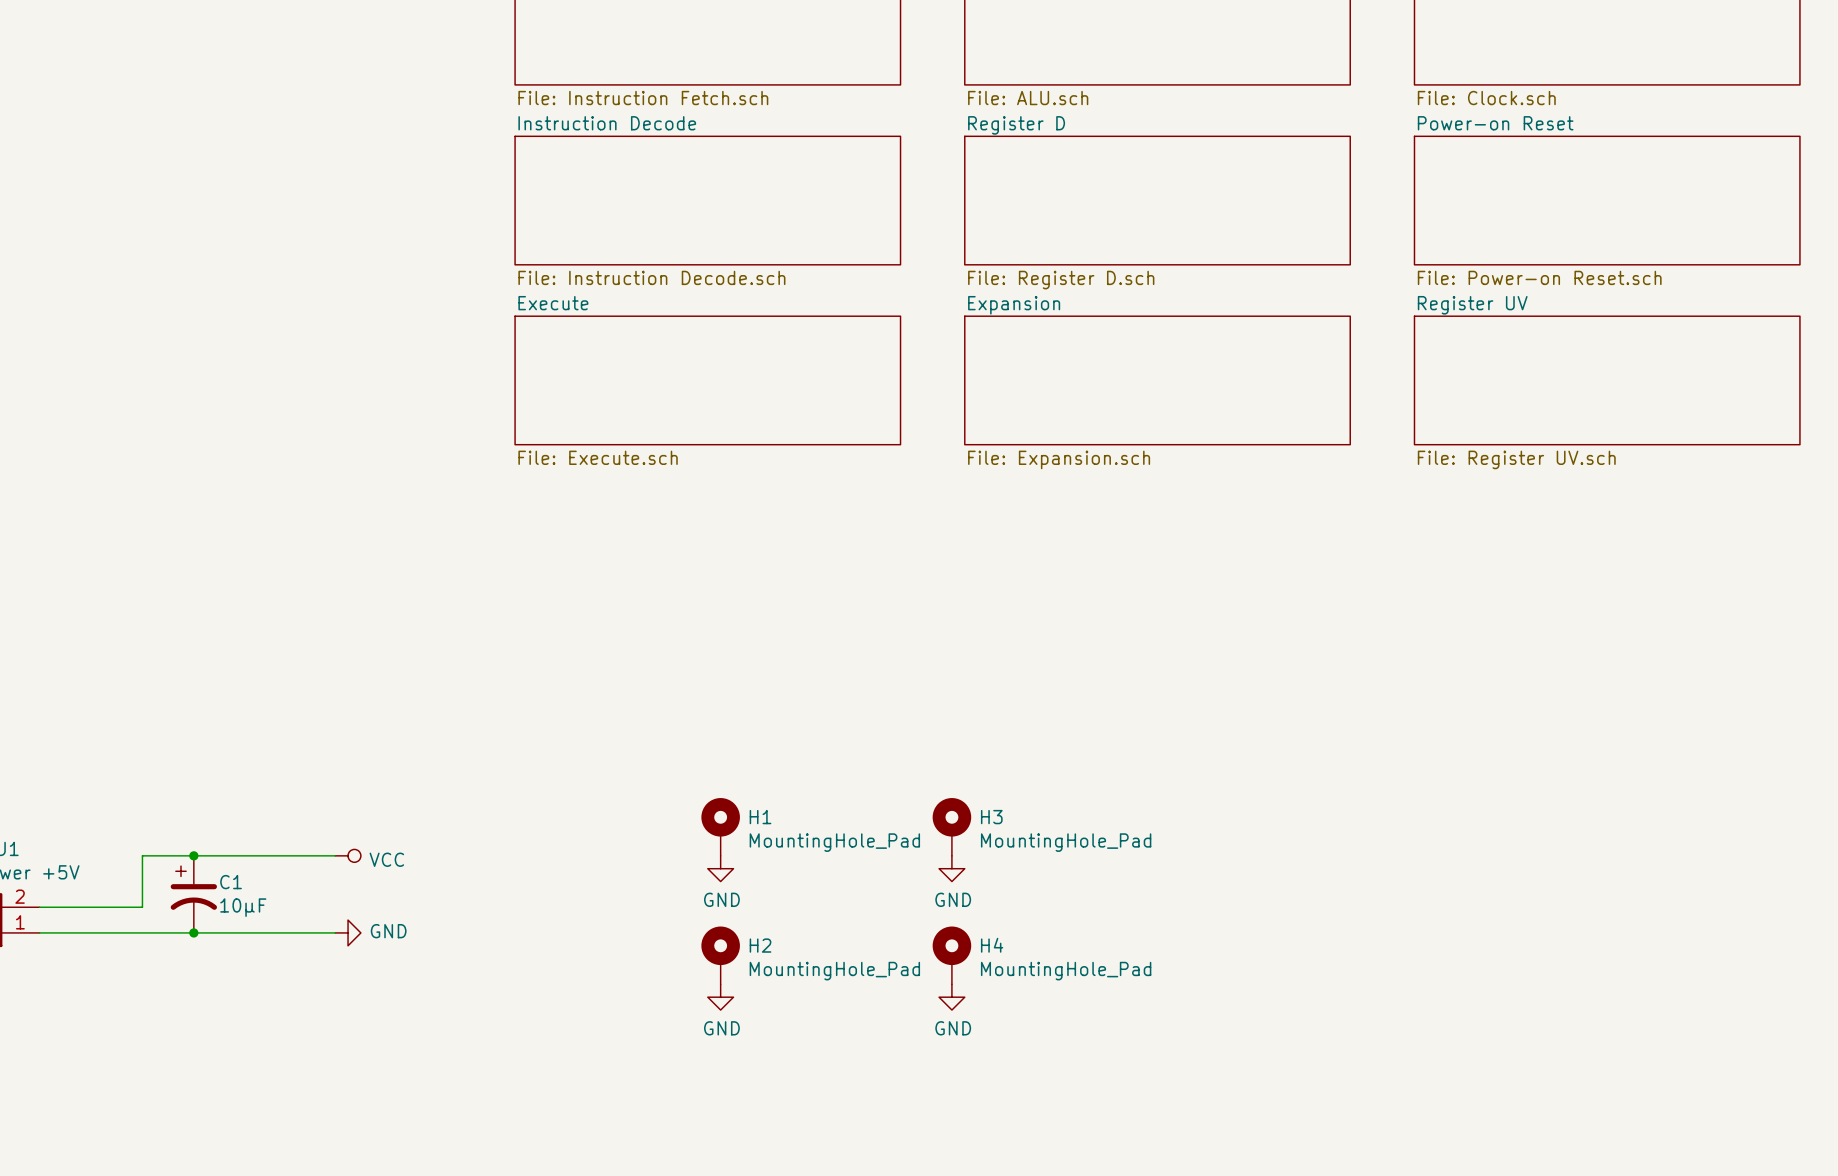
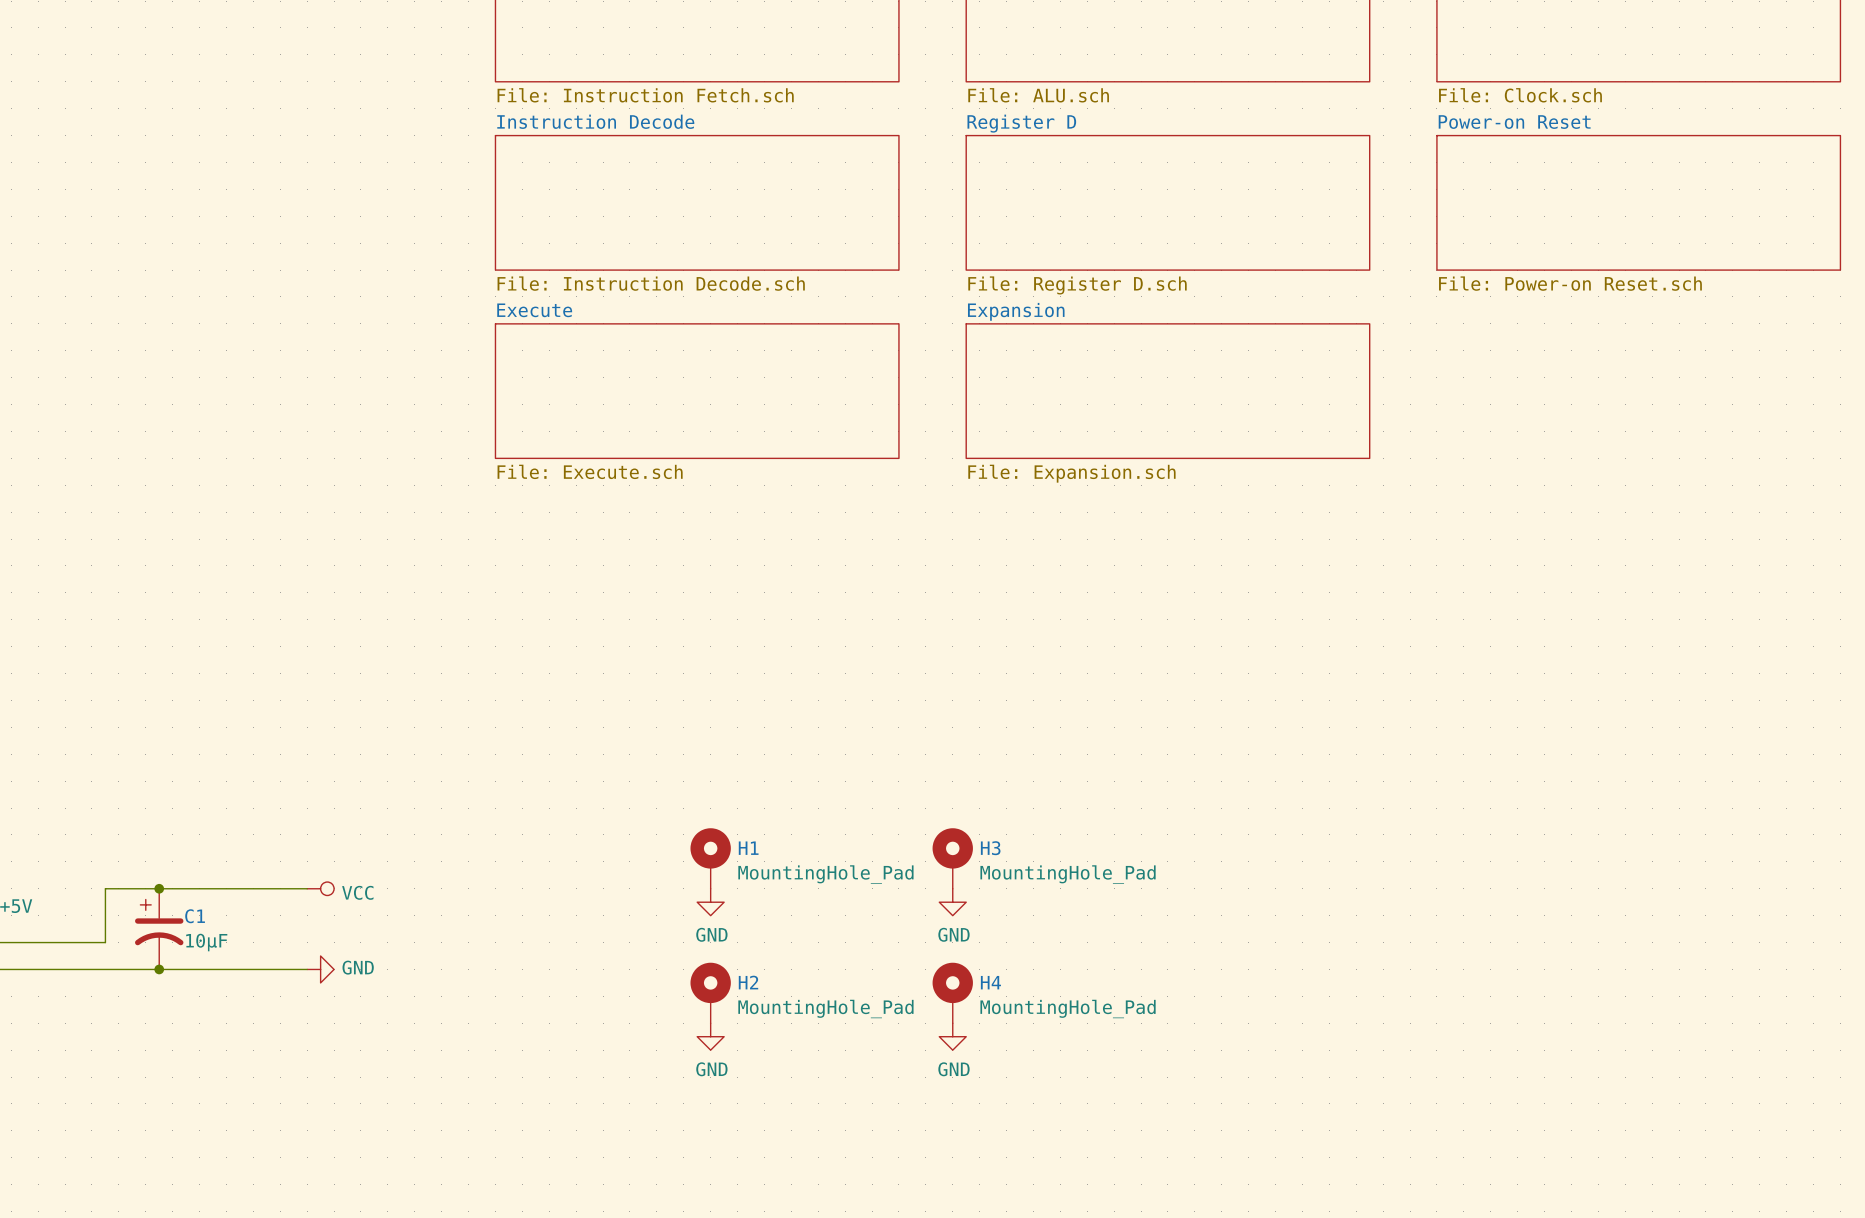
sheet Register UV: File: Register UV.sch (1607, 380) -> none

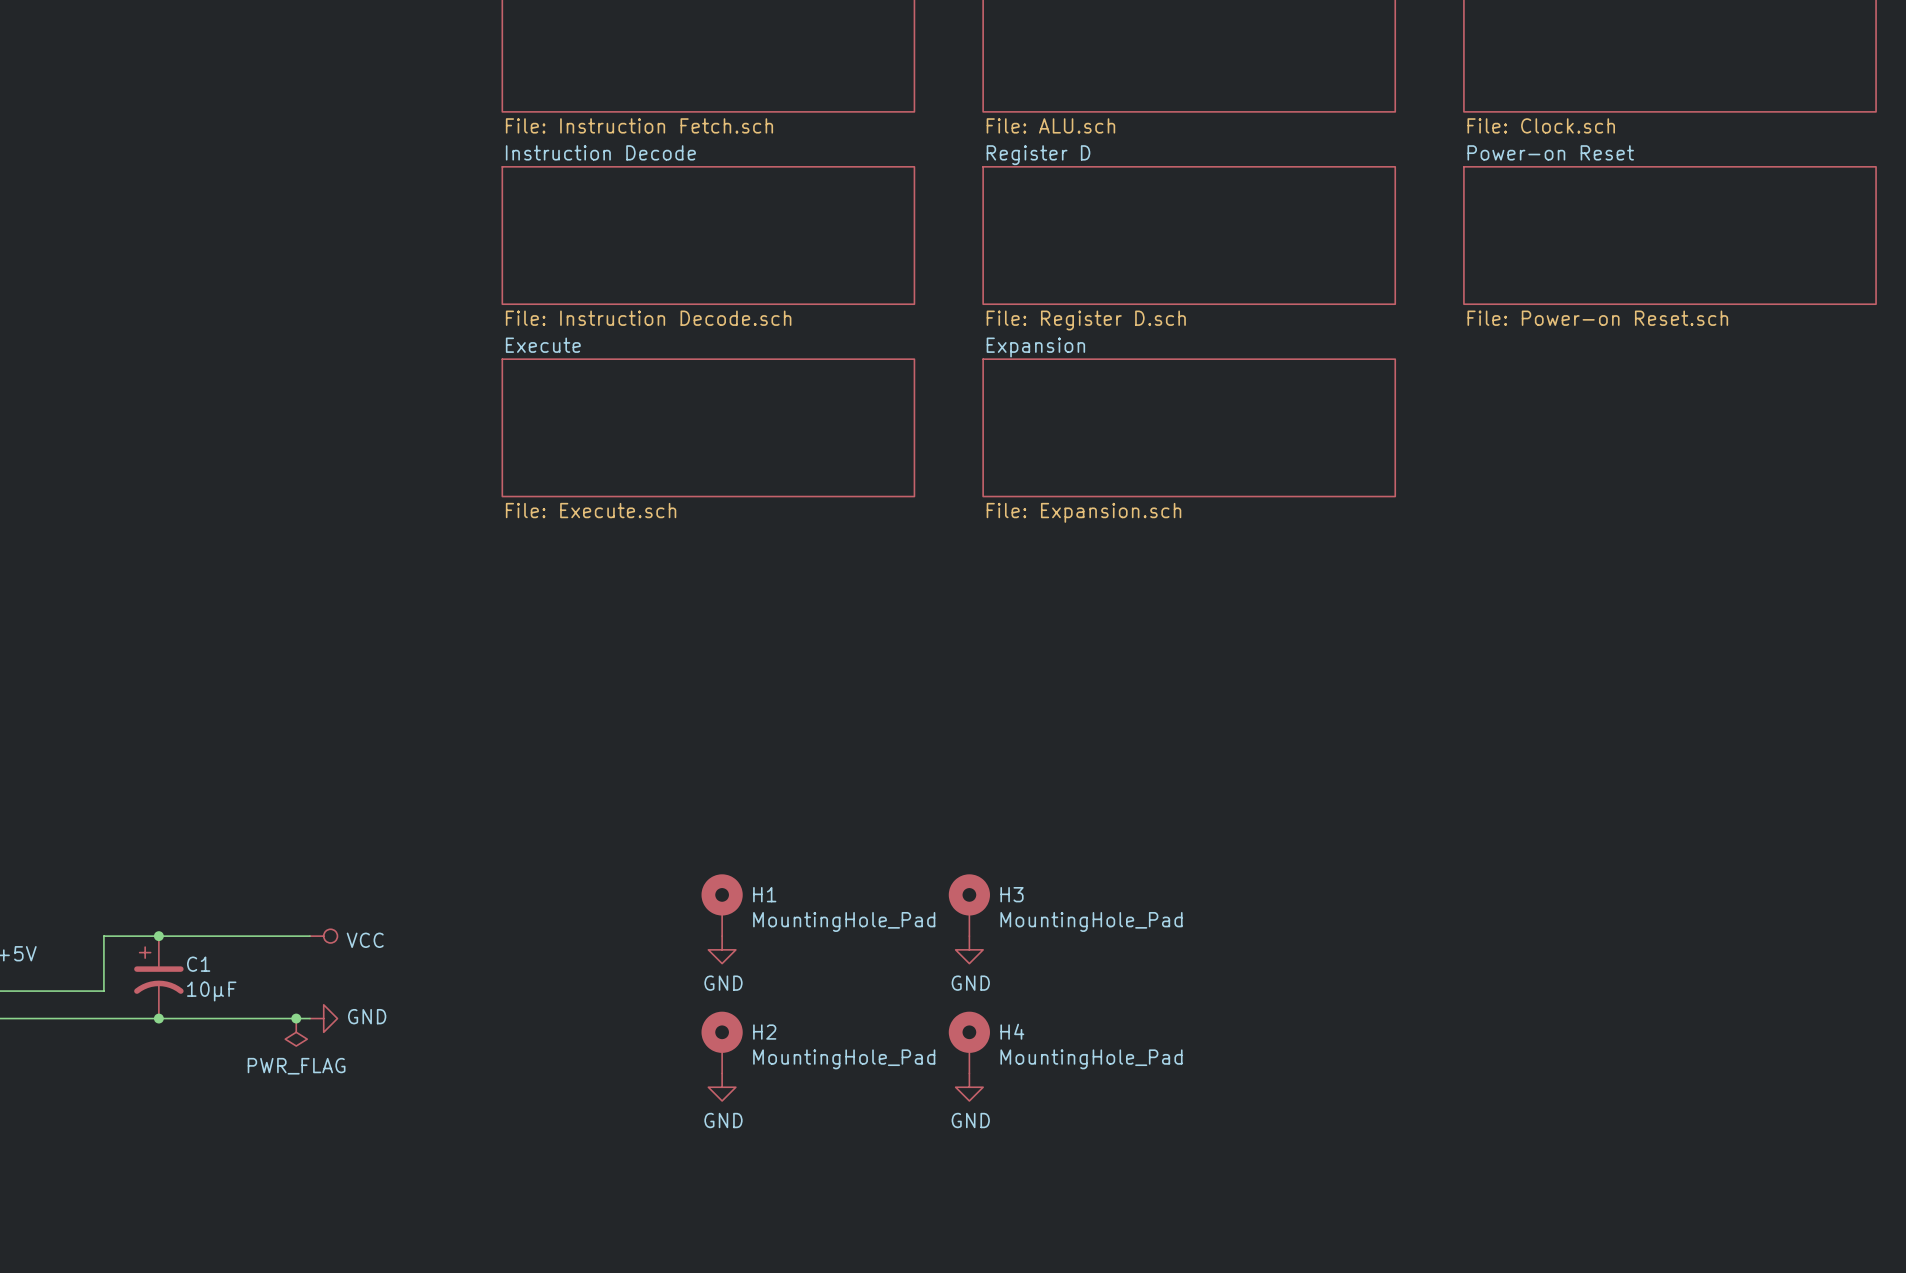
junction: none -> (296, 1018)
power symbol: none -> PWR_FLAG (296, 1032)

